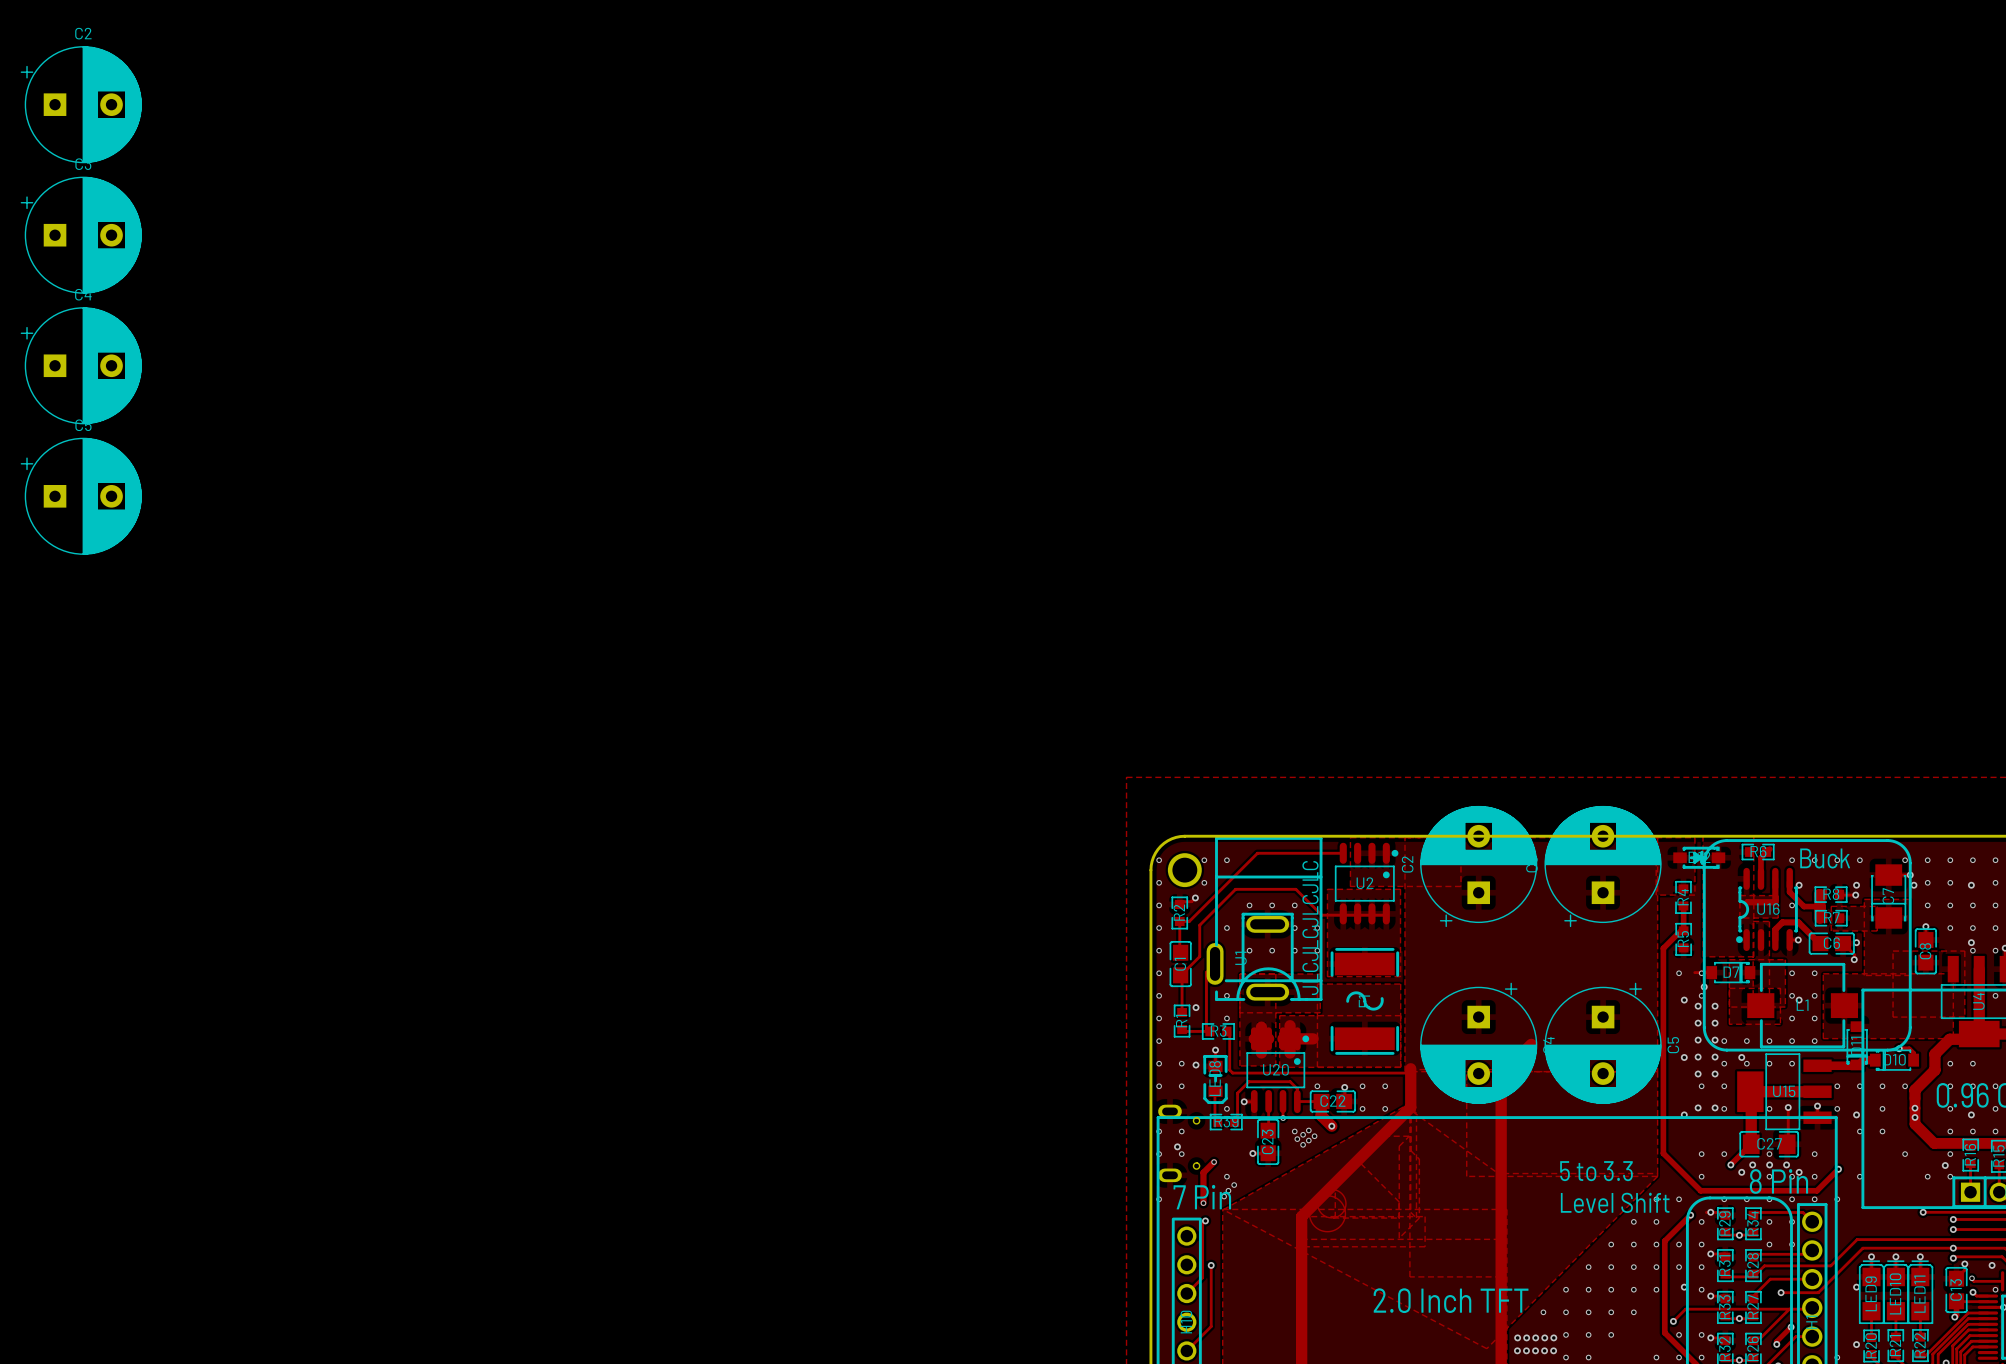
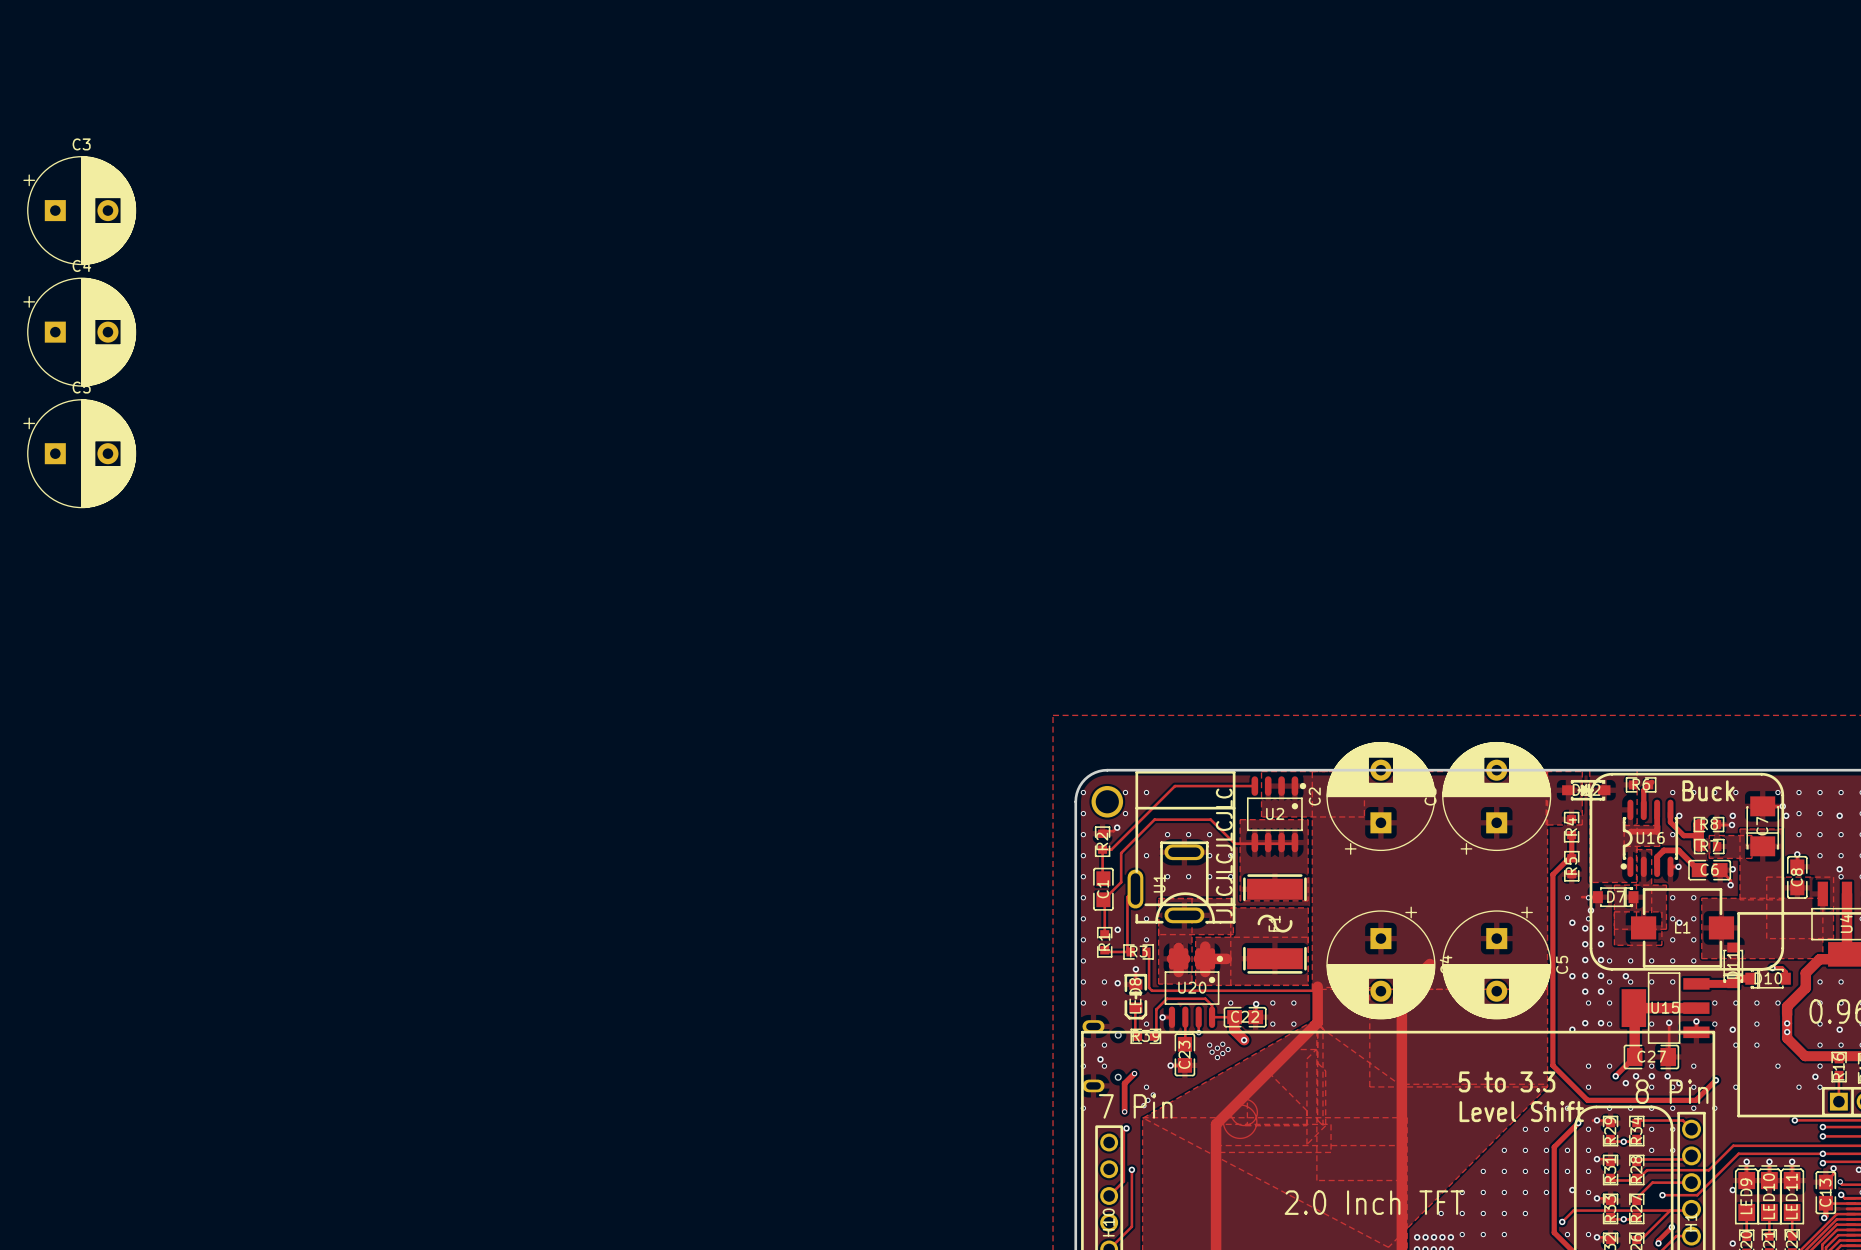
C2: (81, 104) -> none

